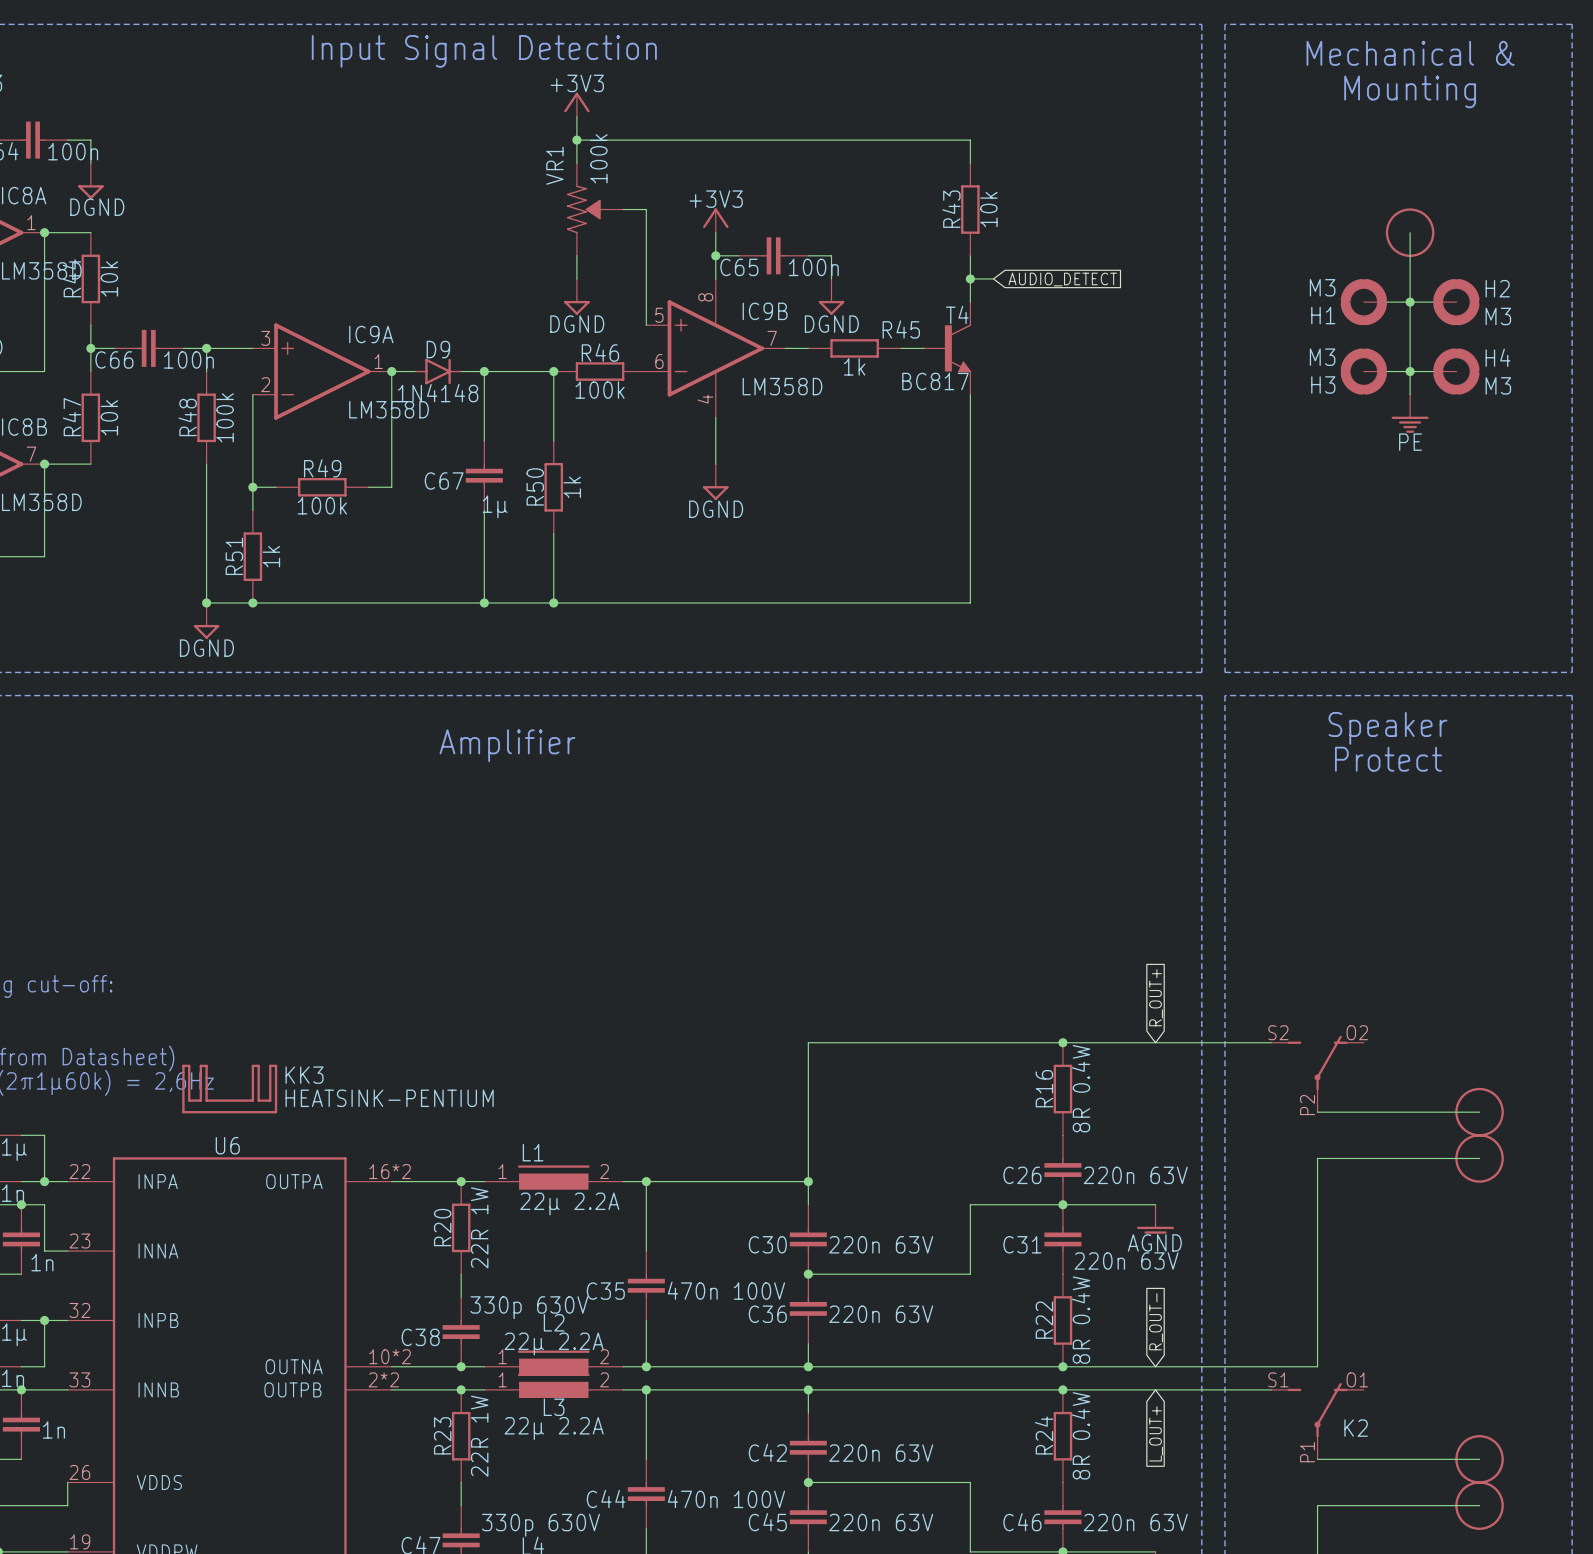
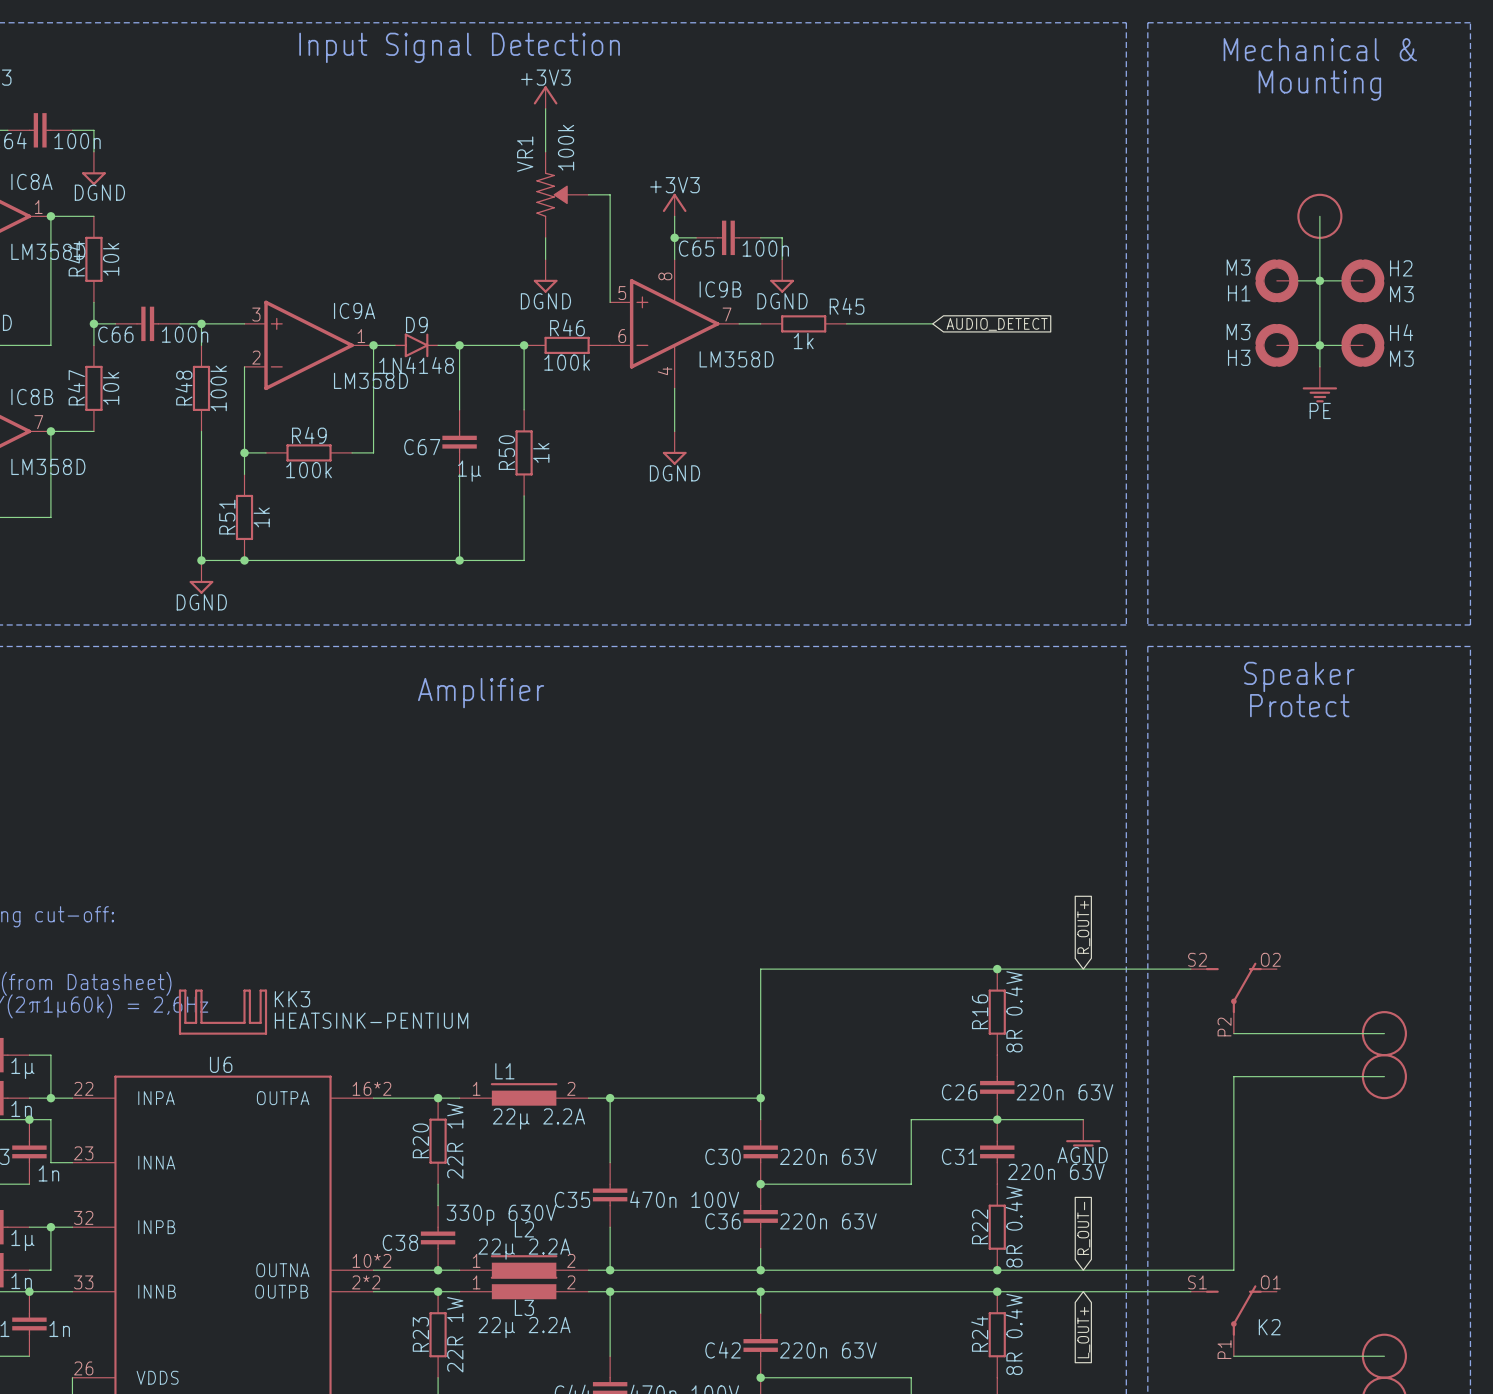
wire: (576, 140) (970, 140) (970, 163) -> none
junction: (576, 140) -> none
R43: 10k (970, 209) -> none
wire: (970, 255) (970, 302) -> none
wire: (970, 278) (993, 278) -> none
junction: (970, 278) -> none
global label position: AUDIO_DETECT (1062, 279) -> AUDIO_DETECT (997, 324)
wire: none -> (868, 323) (932, 323)
T4: BC817 (947, 348) -> none
wire: (970, 394) (970, 602) (553, 602) -> none
junction: (553, 602) -> none

